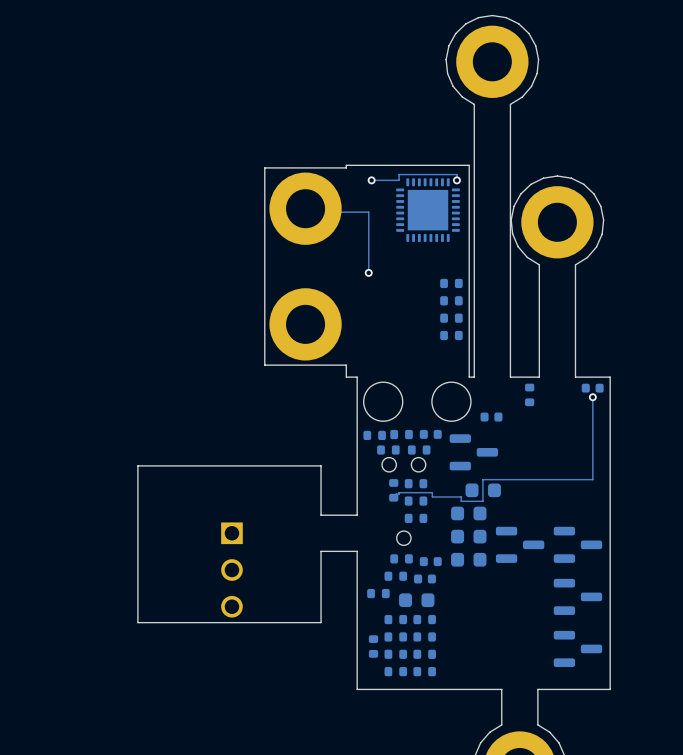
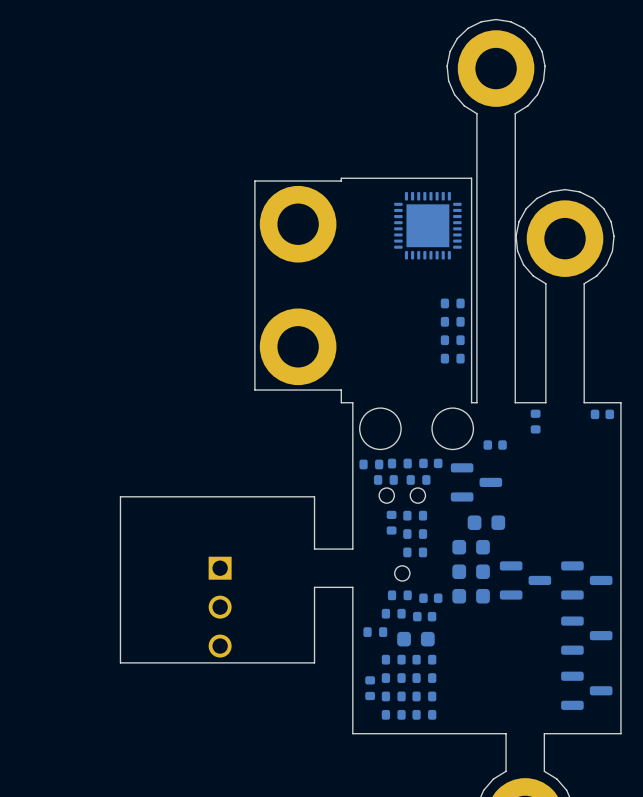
via: (371, 180) -> none
track: (456, 180) (456, 174) (399, 174) (399, 180) (371, 180) -> none
via: (456, 180) -> none
track: (305, 208) (308, 212) (368, 212) (368, 272) -> none
via: (368, 272) -> none
track: (592, 397) (592, 479) (482, 479) (482, 501) (461, 501) (461, 496) (432, 496) (432, 492) (399, 492) (393, 497) -> none
via: (592, 397) -> none

